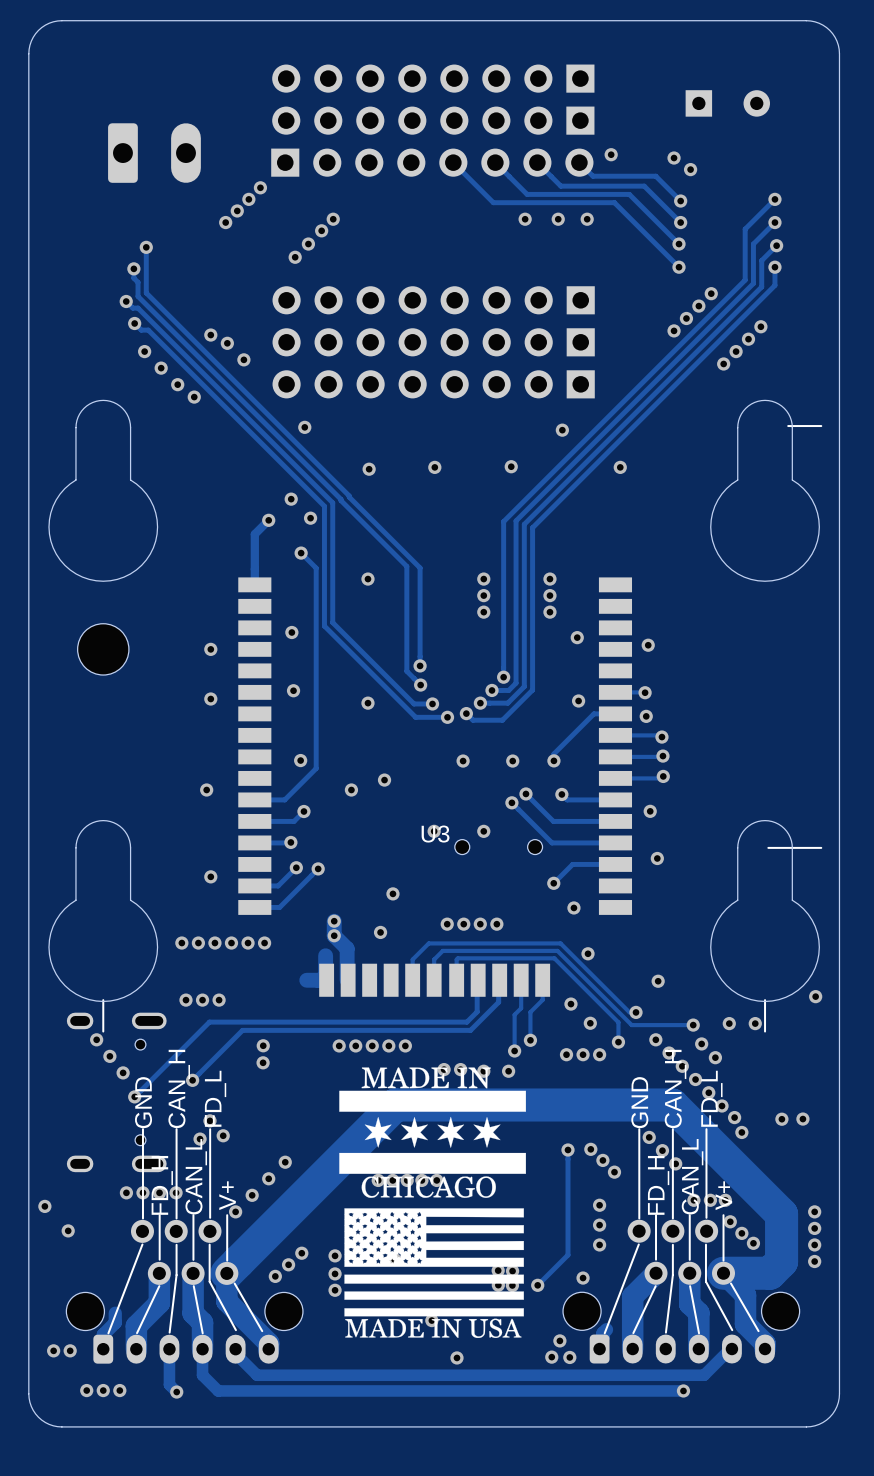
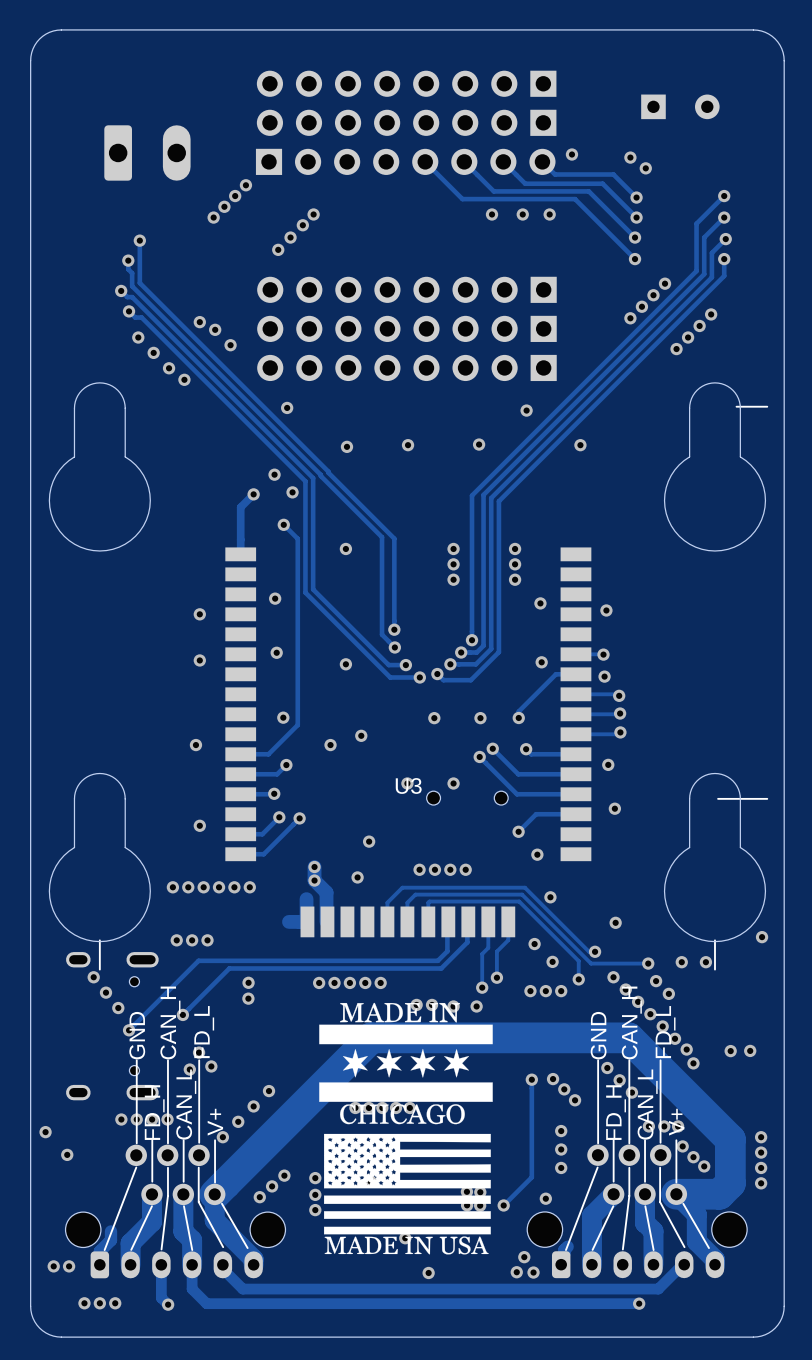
part: (103, 649) -> none

